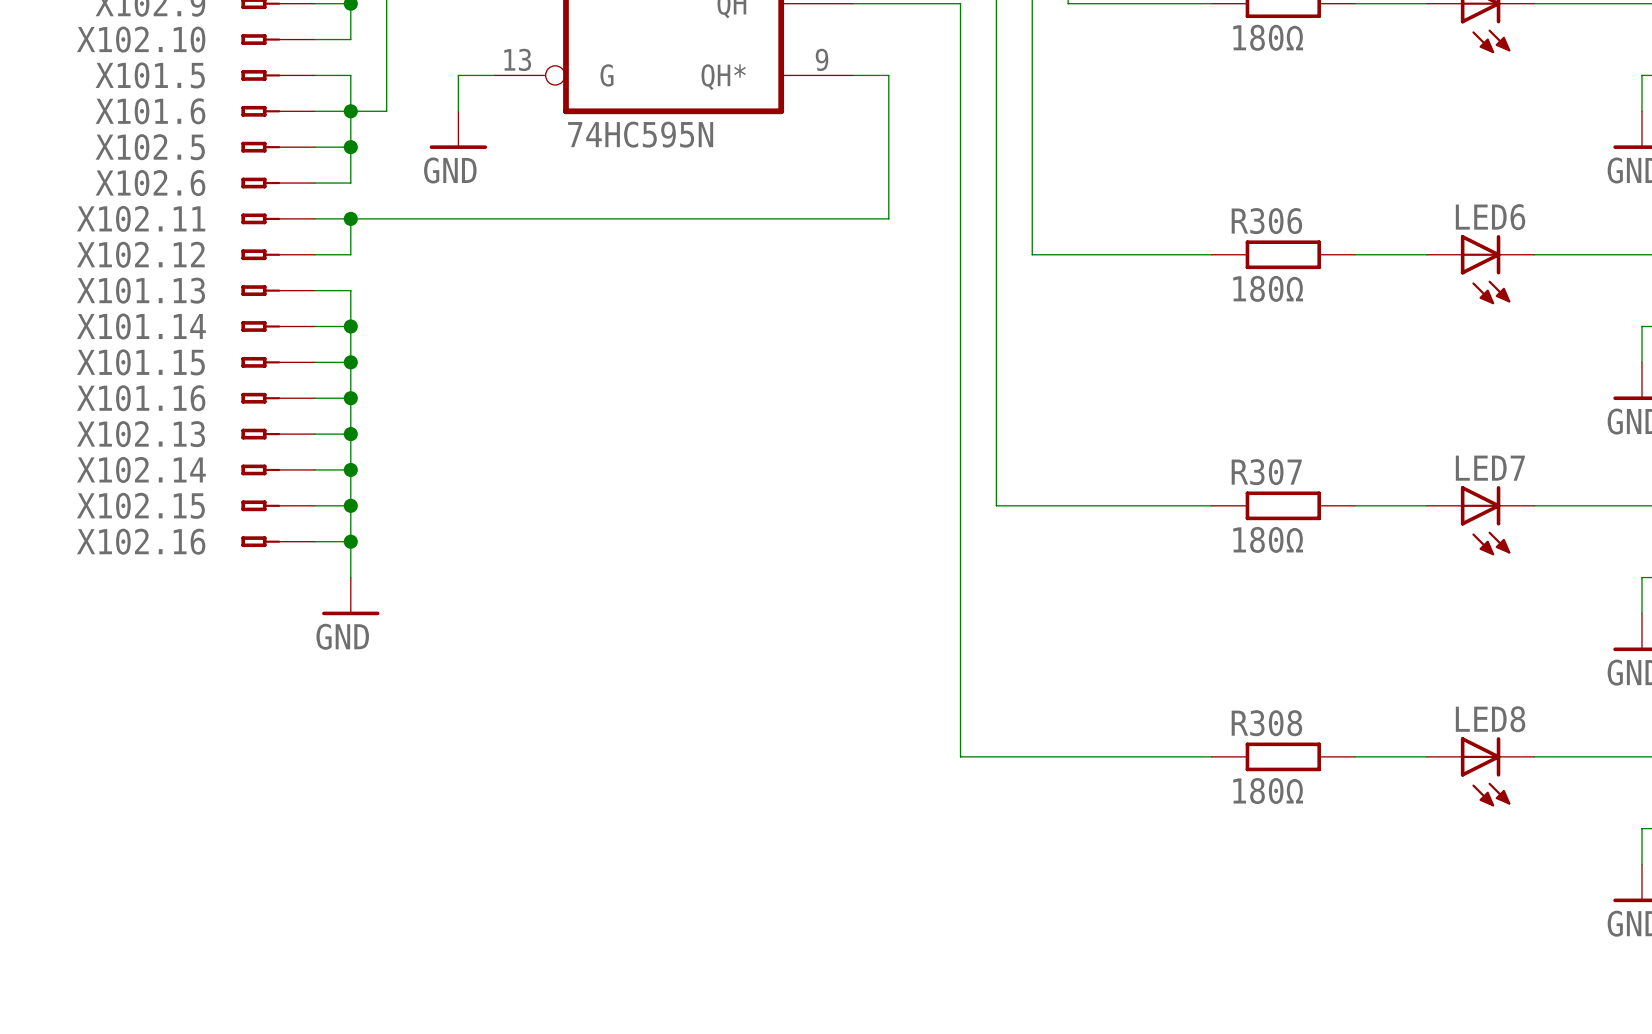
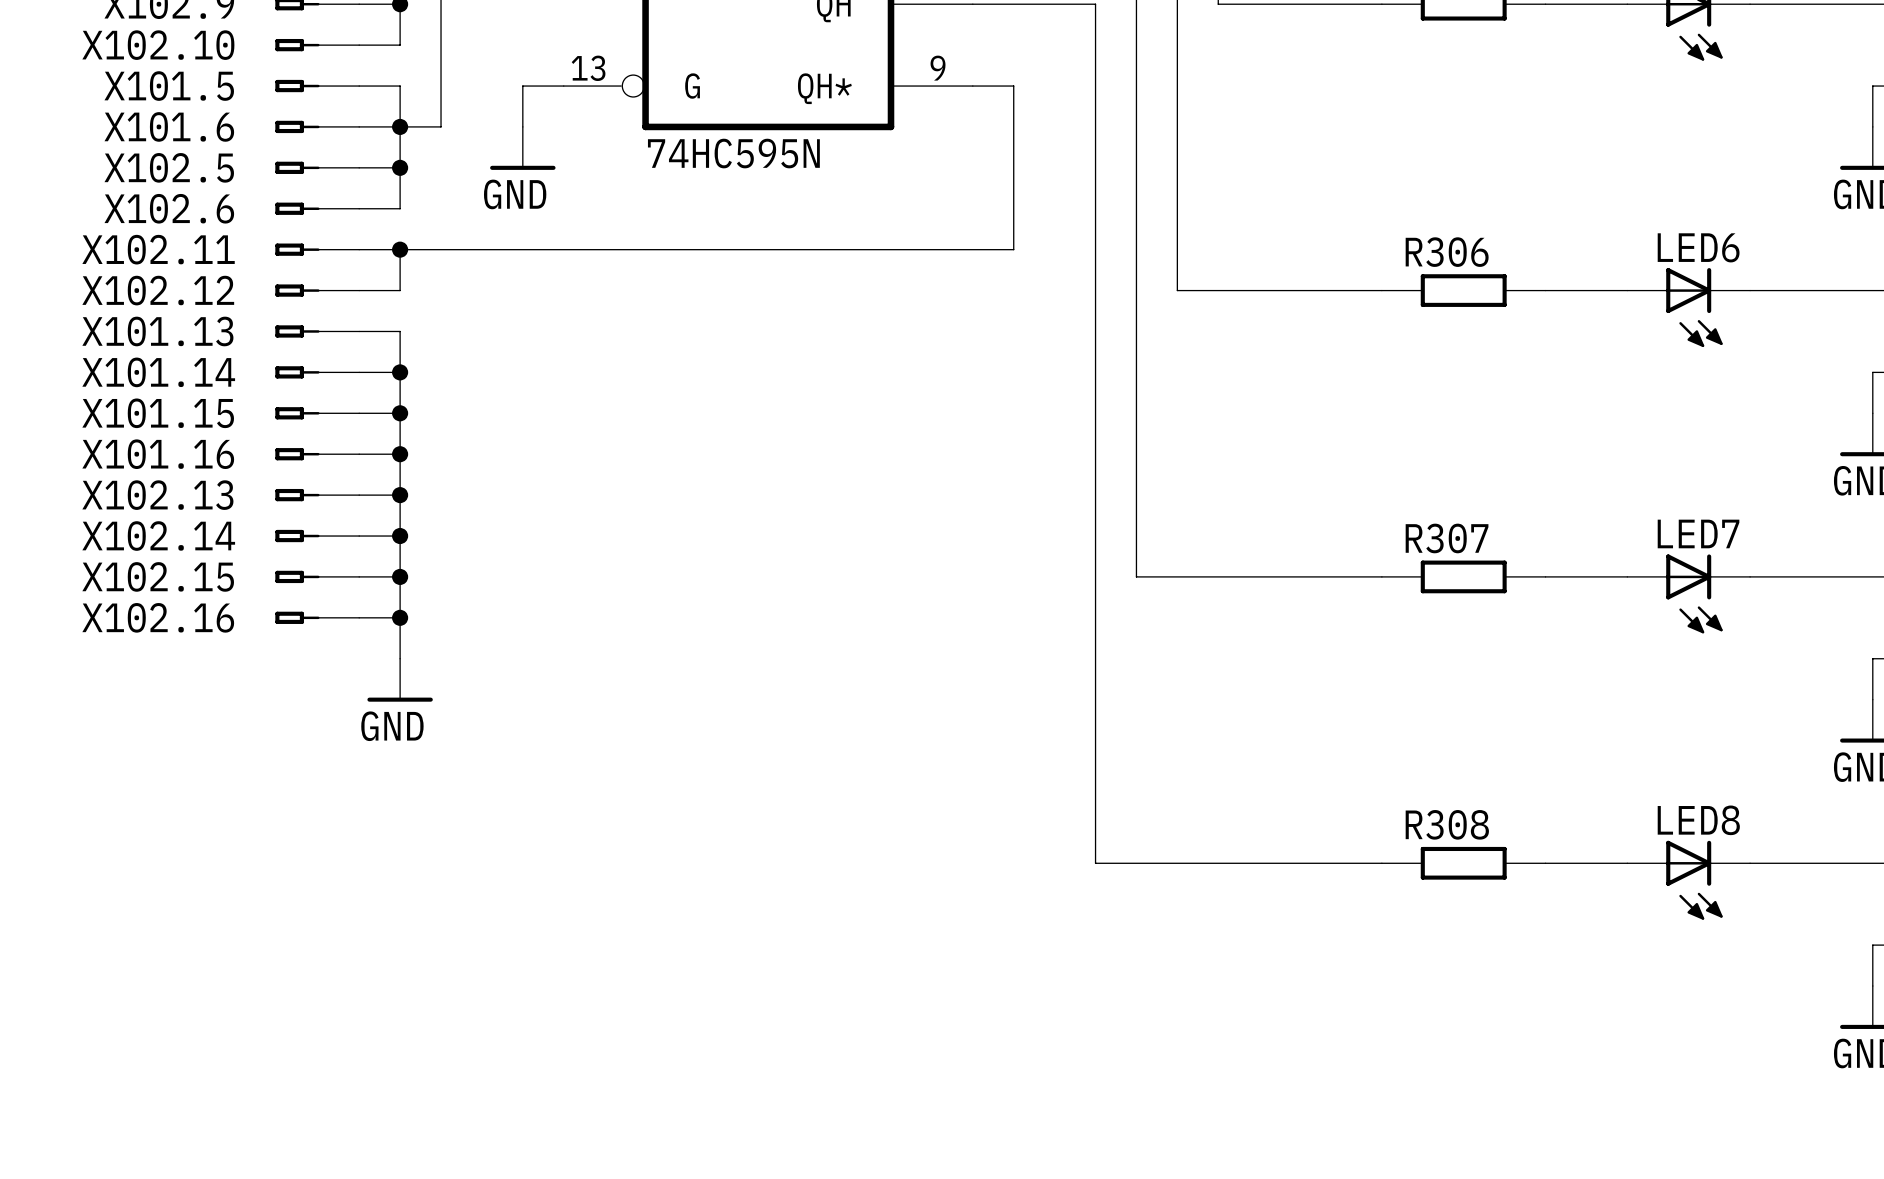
part value: 180Ω (1268, 37) -> none
R306 value: 180Ω (1268, 288) -> none
R307 value: 180Ω (1268, 539) -> none
R308 value: 180Ω (1268, 790) -> none

